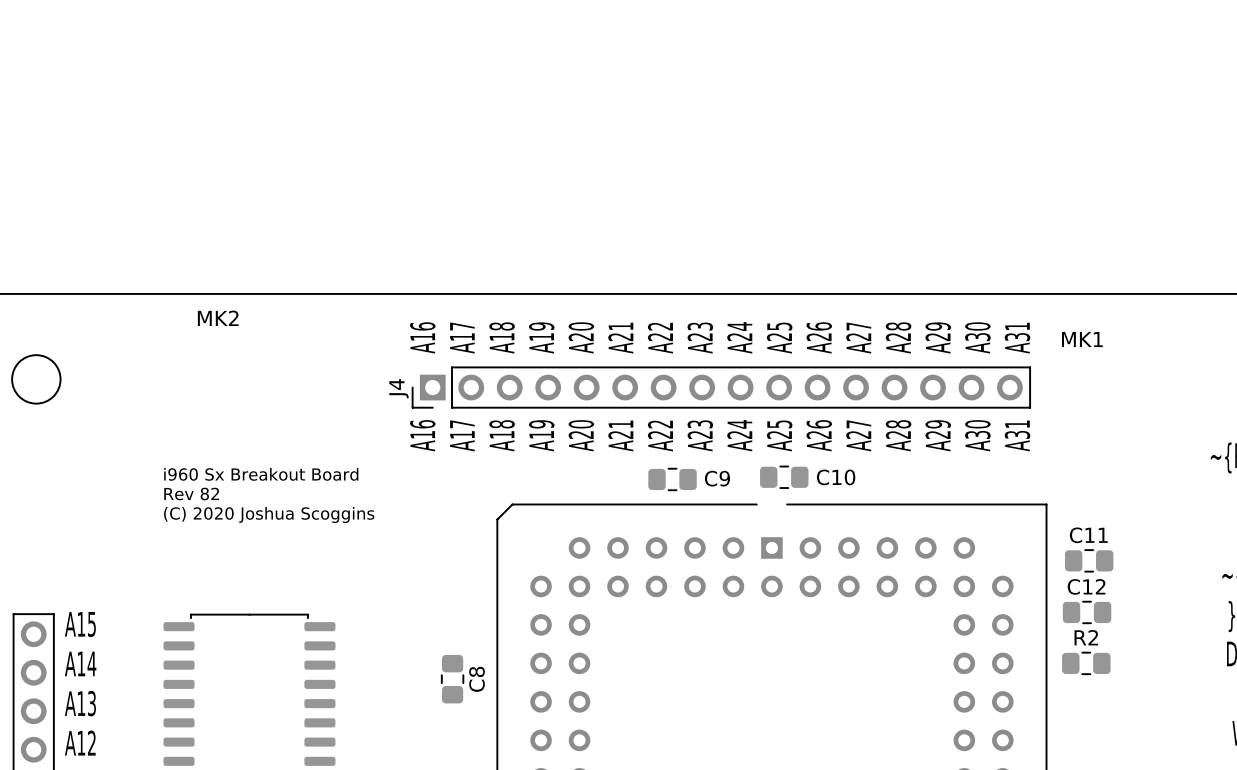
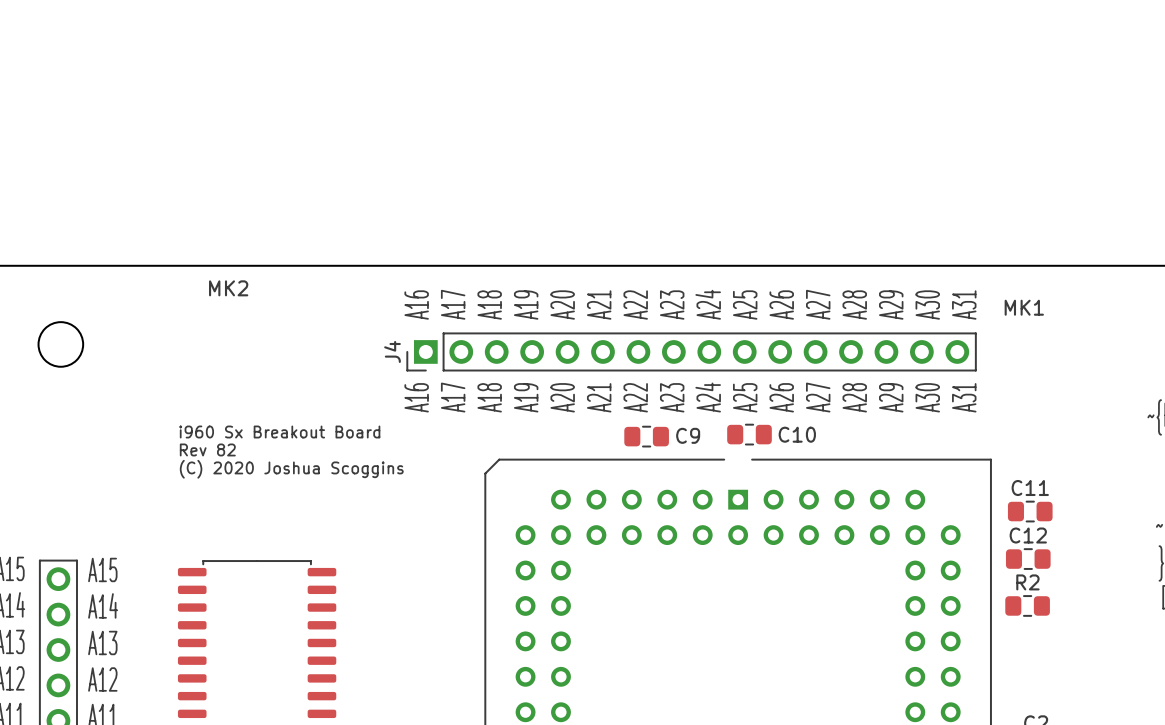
C8: (452, 679) -> none

